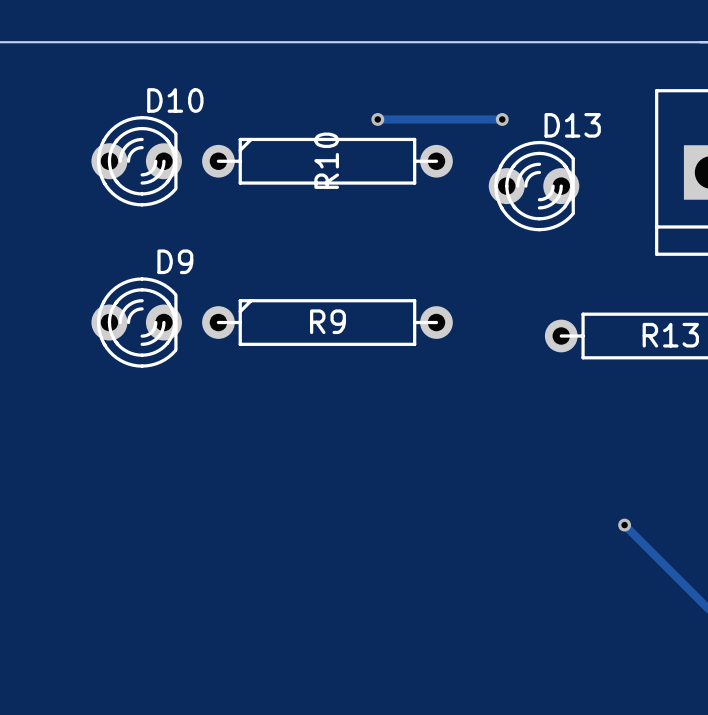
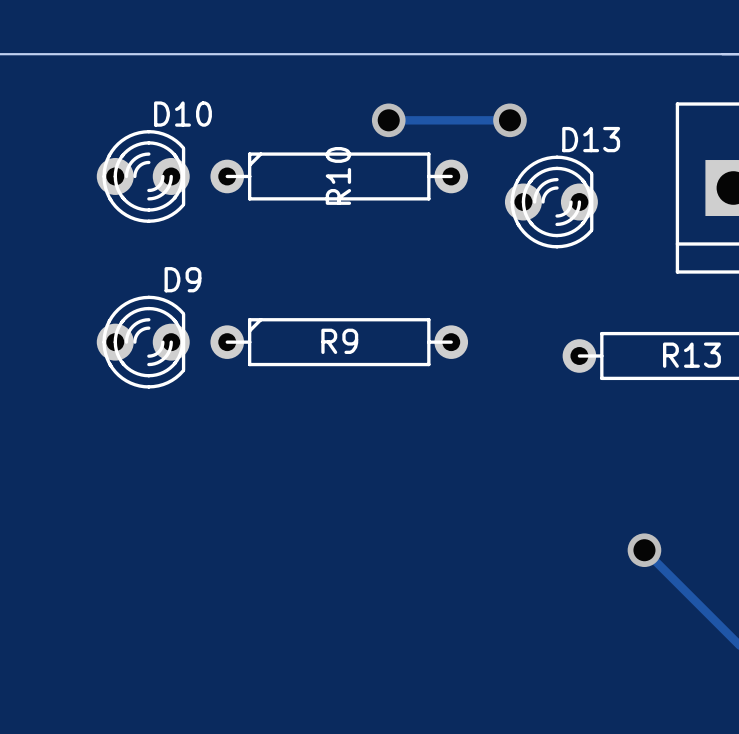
track: none -> (388, 120) (509, 120)
via size: [371, 113, 385, 126] -> [371, 103, 406, 138]
via size: [495, 113, 509, 126] -> [493, 103, 527, 138]
track: (377, 119) (502, 119) -> none
via size: [618, 518, 632, 532] -> [627, 533, 662, 568]

